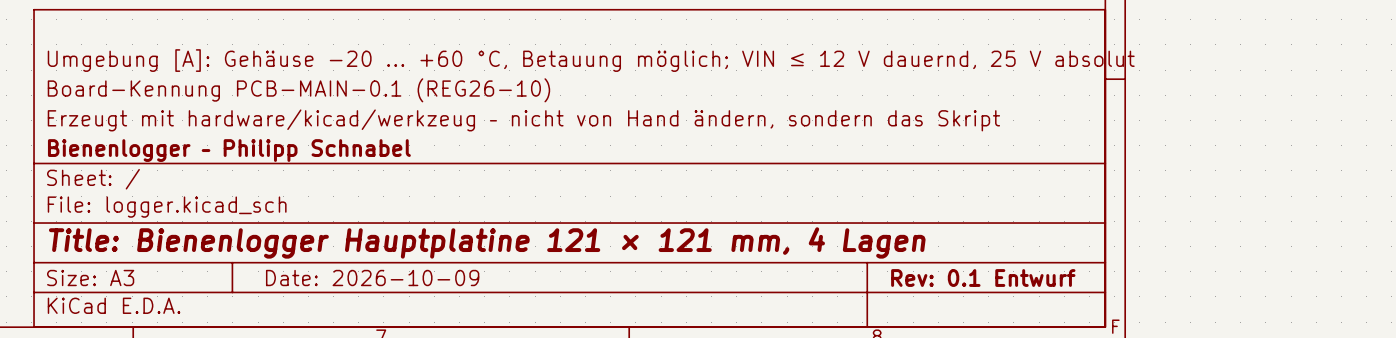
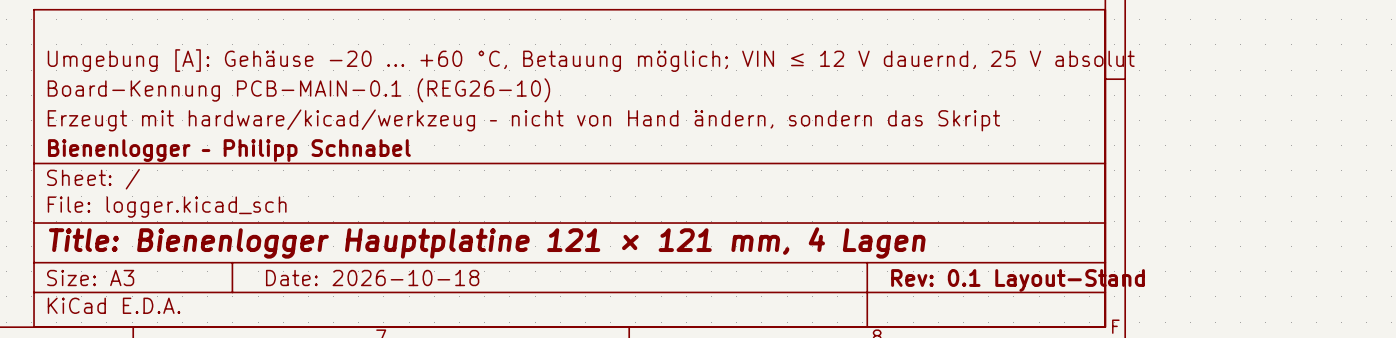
title block: Date: 2026-10-09 (372, 278) -> Date: 2026-10-18 (372, 278)
title block: Rev: 0.1 Entwurf (983, 278) -> Rev: 0.1 Layout-Stand (1018, 280)

